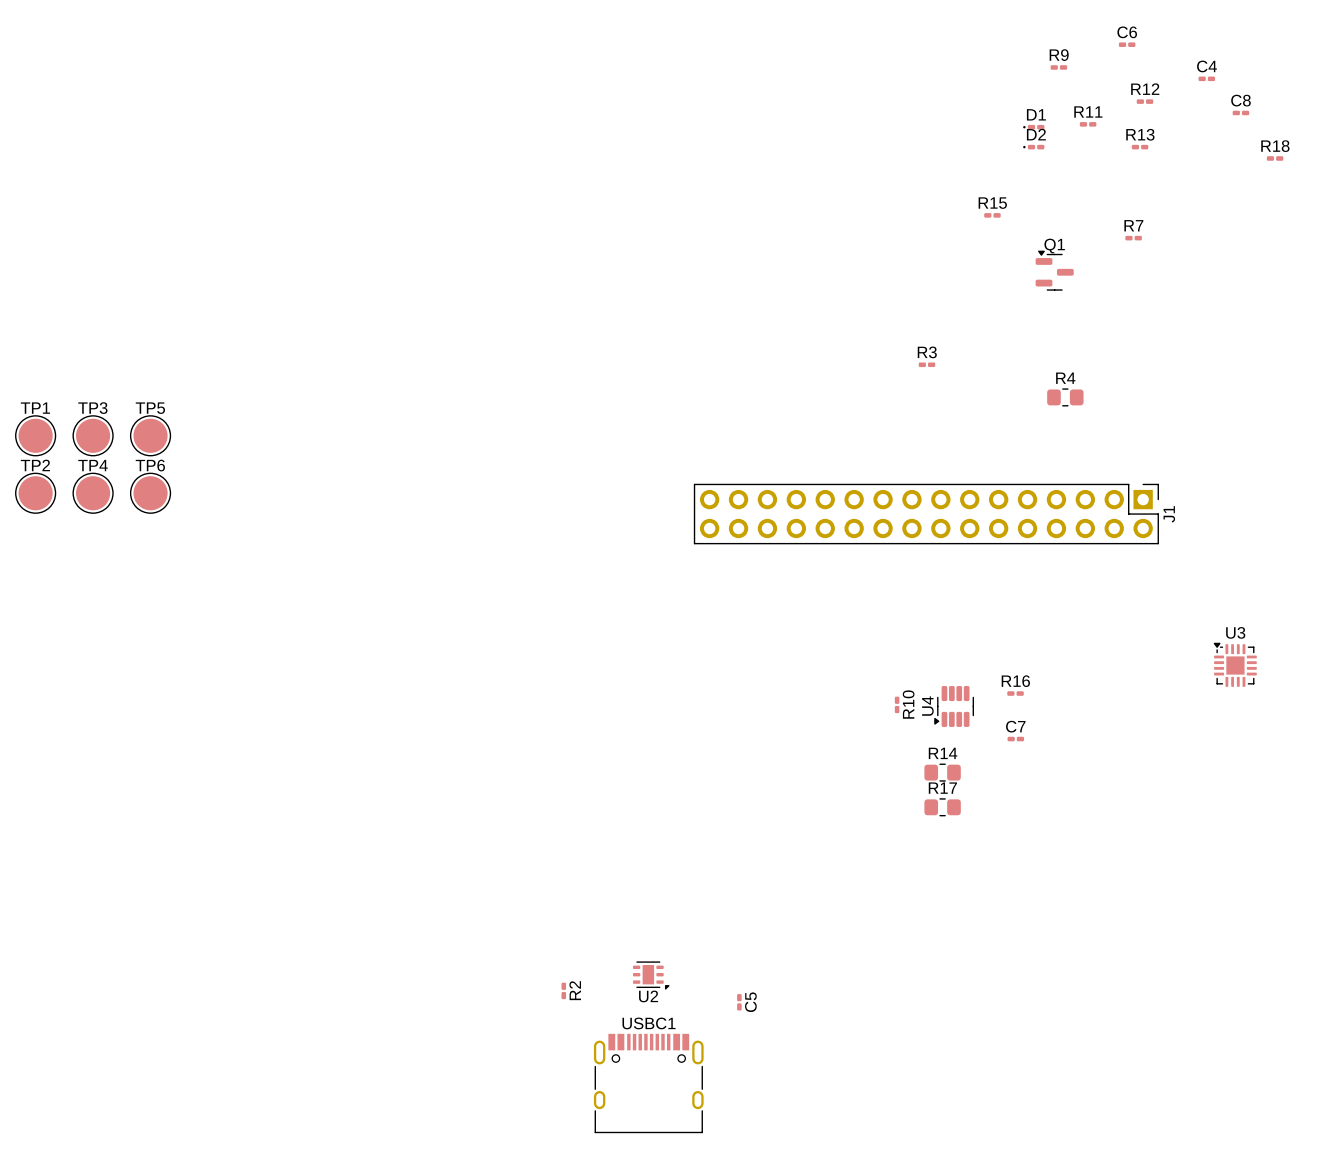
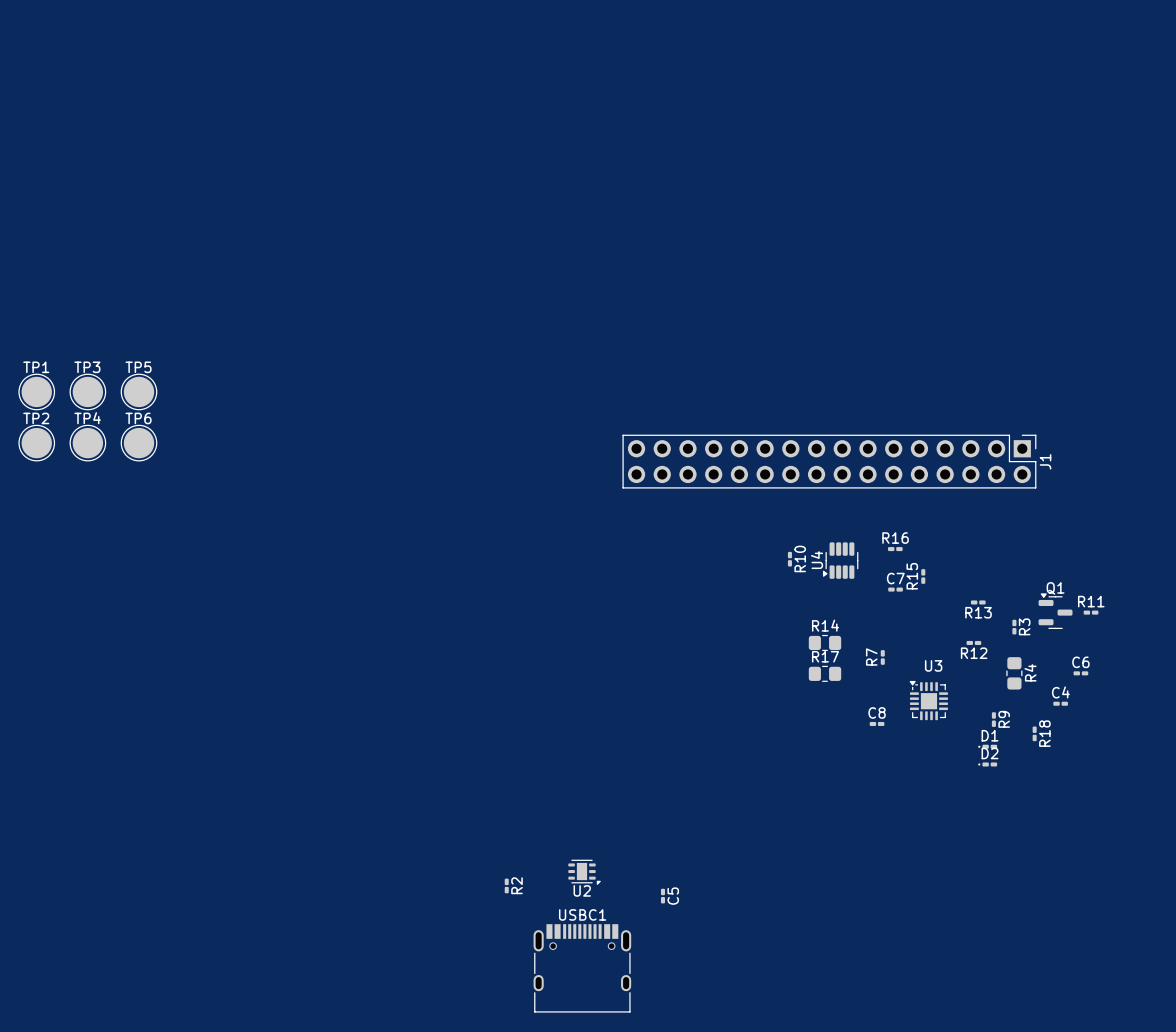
C6 position: (1127, 44) -> (1080, 673)
R9 rotation: 0° (1058, 67) -> 90° clockwise (993, 719)
R9 position: (1058, 67) -> (993, 719)
C4 position: (1206, 78) -> (1060, 703)
R12 name position: R12 (1145, 89) -> R12 (974, 653)
R12 position: (1144, 101) -> (973, 642)
C8 position: (1240, 112) -> (877, 723)
R11 position: (1088, 124) -> (1091, 612)
D1 position: (1033, 127) -> (987, 746)
R13 name position: R13 (1140, 134) -> R13 (978, 612)
D2 position: (1033, 147) -> (987, 764)
R13 position: (1140, 147) -> (978, 602)
R18 rotation: 0° (1275, 158) -> 90° clockwise (1034, 733)
R18 position: (1275, 158) -> (1034, 733)
R15 rotation: 0° (992, 215) -> 90° clockwise (923, 576)
R15 position: (992, 215) -> (923, 576)
R7 rotation: 0° (1133, 238) -> 90° clockwise (882, 657)
R7 position: (1133, 238) -> (882, 657)
Q1 position: (1054, 270) -> (1055, 611)
R3 rotation: 0° (926, 364) -> 90° clockwise (1014, 627)
R3 position: (926, 364) -> (1014, 627)
R4 rotation: 0° (1065, 397) -> 90° clockwise (1014, 673)
R4 position: (1065, 397) -> (1014, 673)
U3 name position: U3 (1235, 632) -> U3 (933, 665)
U3 position: (1235, 664) -> (928, 700)
R16 position: (1015, 693) -> (895, 549)
R10 position: (897, 704) -> (789, 559)
U4 position: (954, 706) -> (840, 560)
C7 position: (1015, 739) -> (895, 589)
R14 position: (942, 772) -> (824, 642)
R17 position: (942, 807) -> (824, 673)

